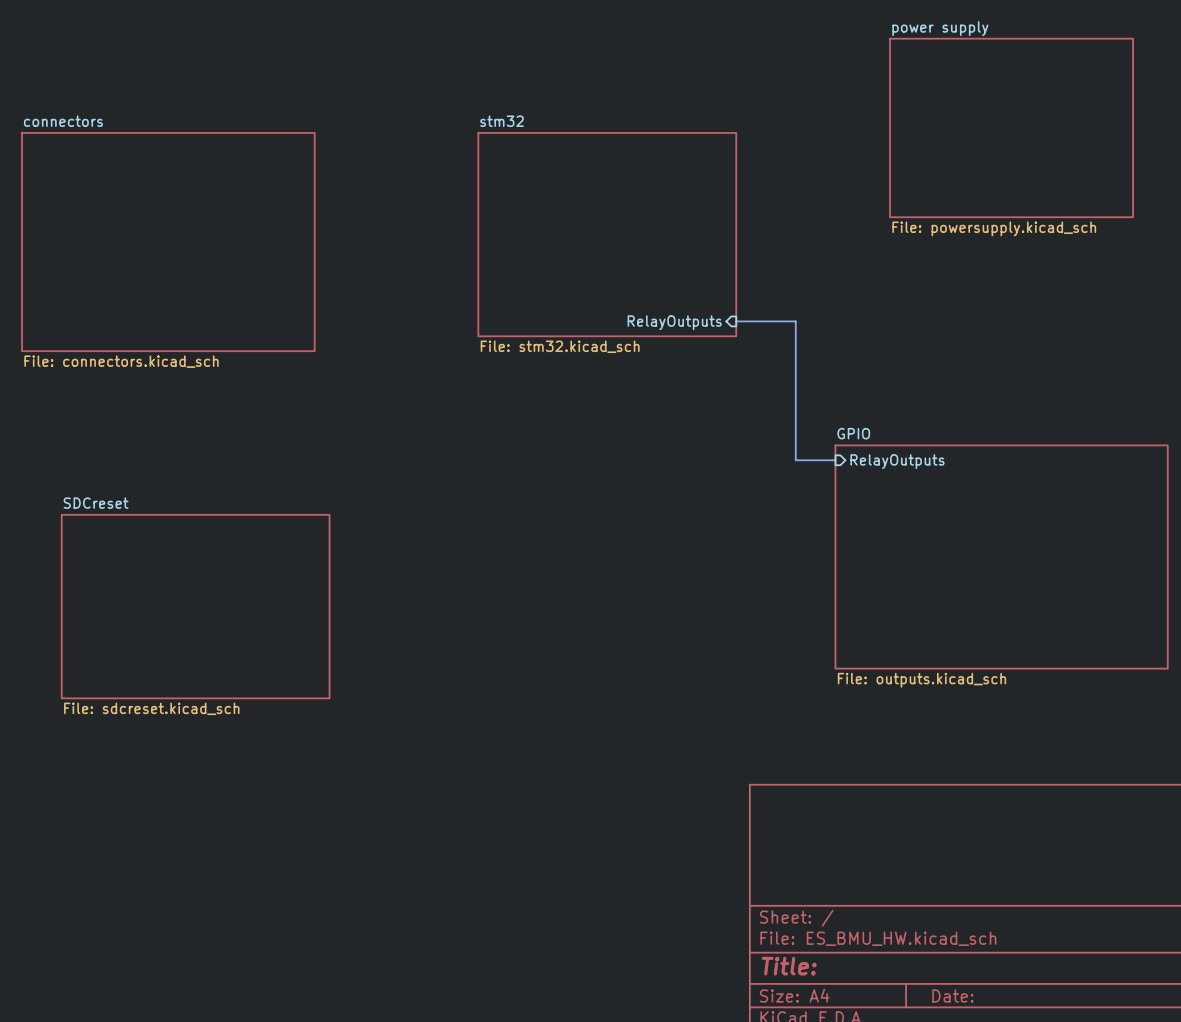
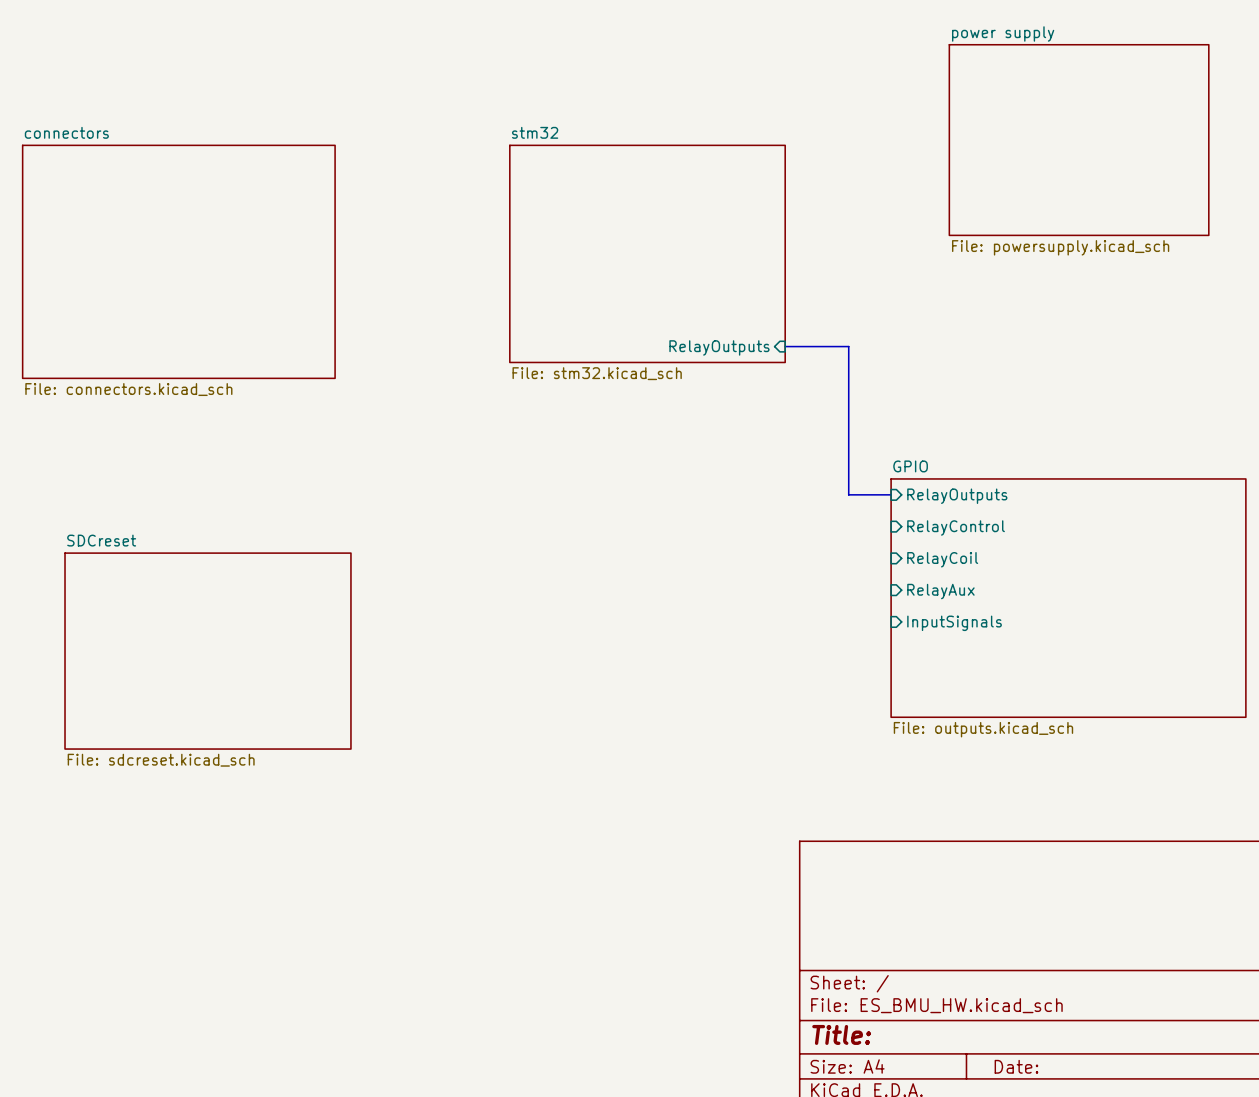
sheet pin: none -> RelayControl (956, 527)
sheet pin: none -> RelayCoil (942, 559)
sheet pin: none -> RelayAux (940, 591)
sheet pin: none -> InputSignals (954, 623)

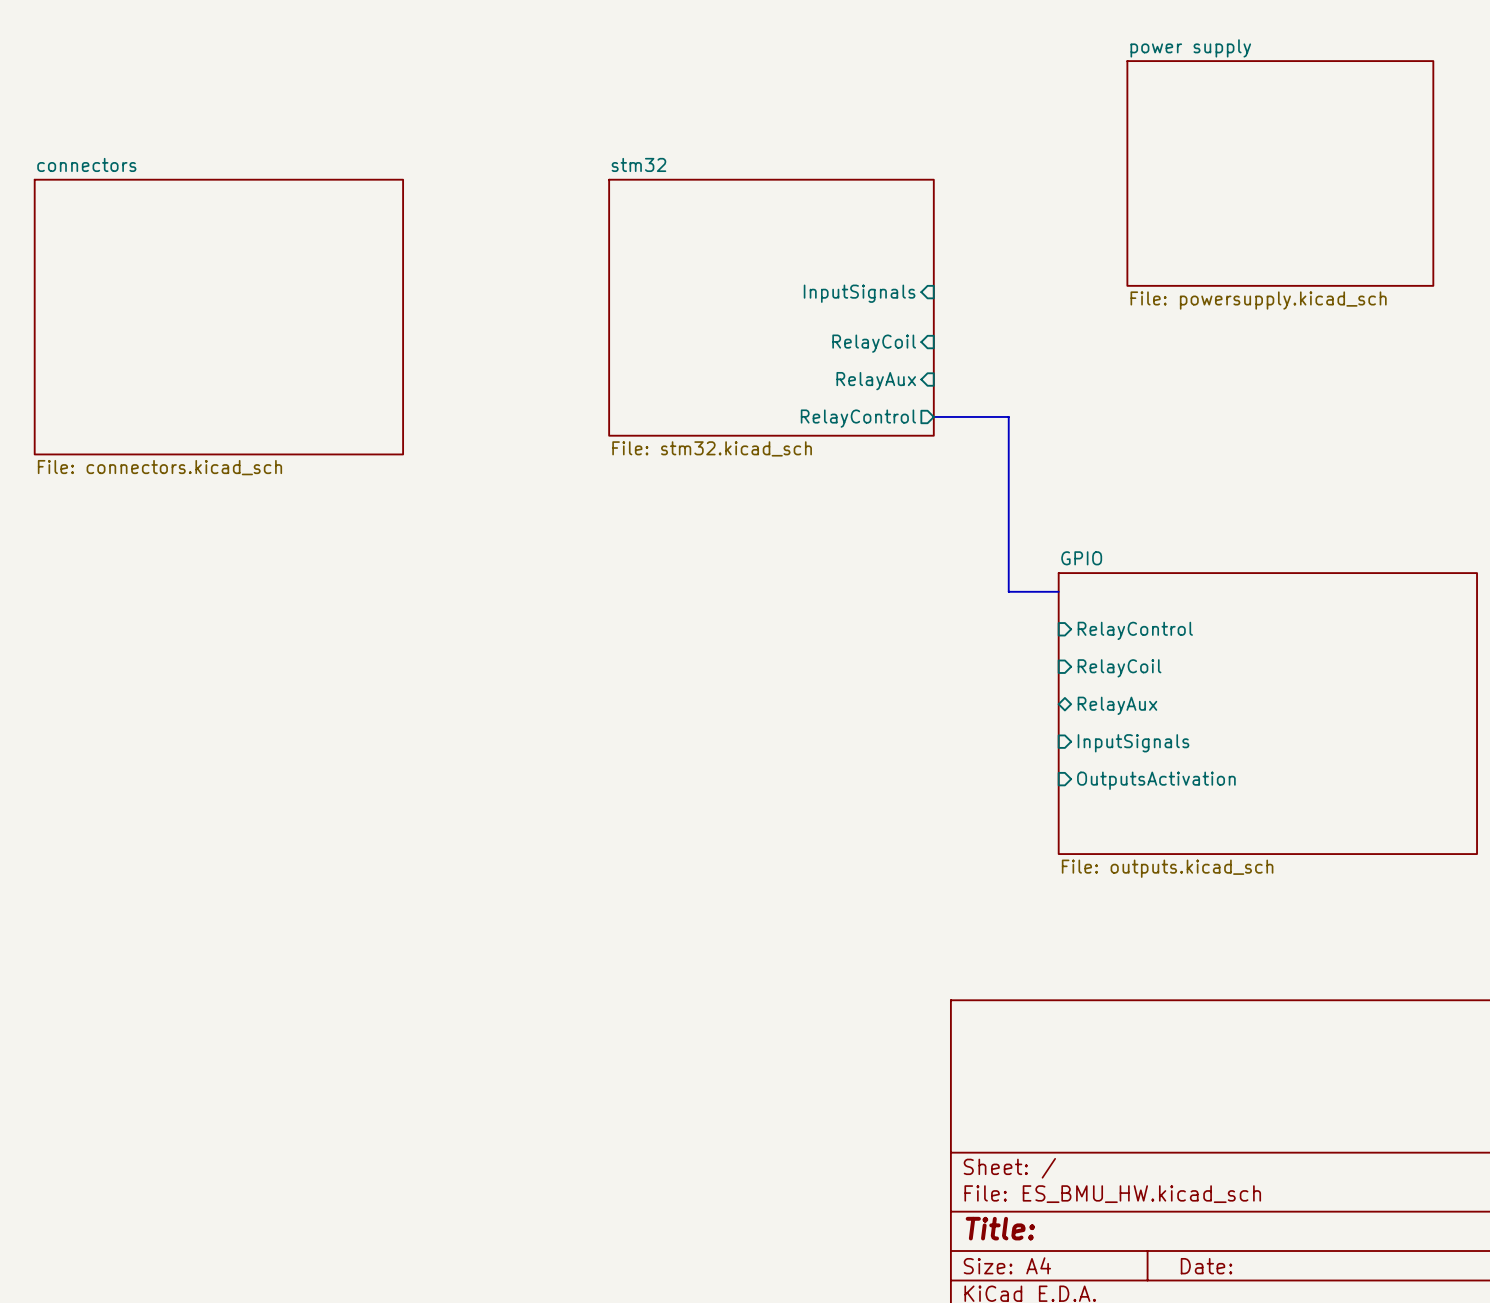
sheet pin: none -> InputSignals (859, 293)
sheet pin: none -> RelayCoil (874, 343)
sheet pin: none -> RelayAux (876, 381)
sheet pin shape: input (719, 347) -> output (858, 418)
sheet pin: RelayOutputs (719, 347) -> RelayControl (858, 418)
sheet pin: RelayOutputs (957, 496) -> none
sheet pin shape: input (940, 591) -> bidirectional (1117, 705)
sheet SDCreset: File: sdcreset.kicad_sch (207, 651) -> none
sheet pin: none -> OutputsActivation (1156, 780)

